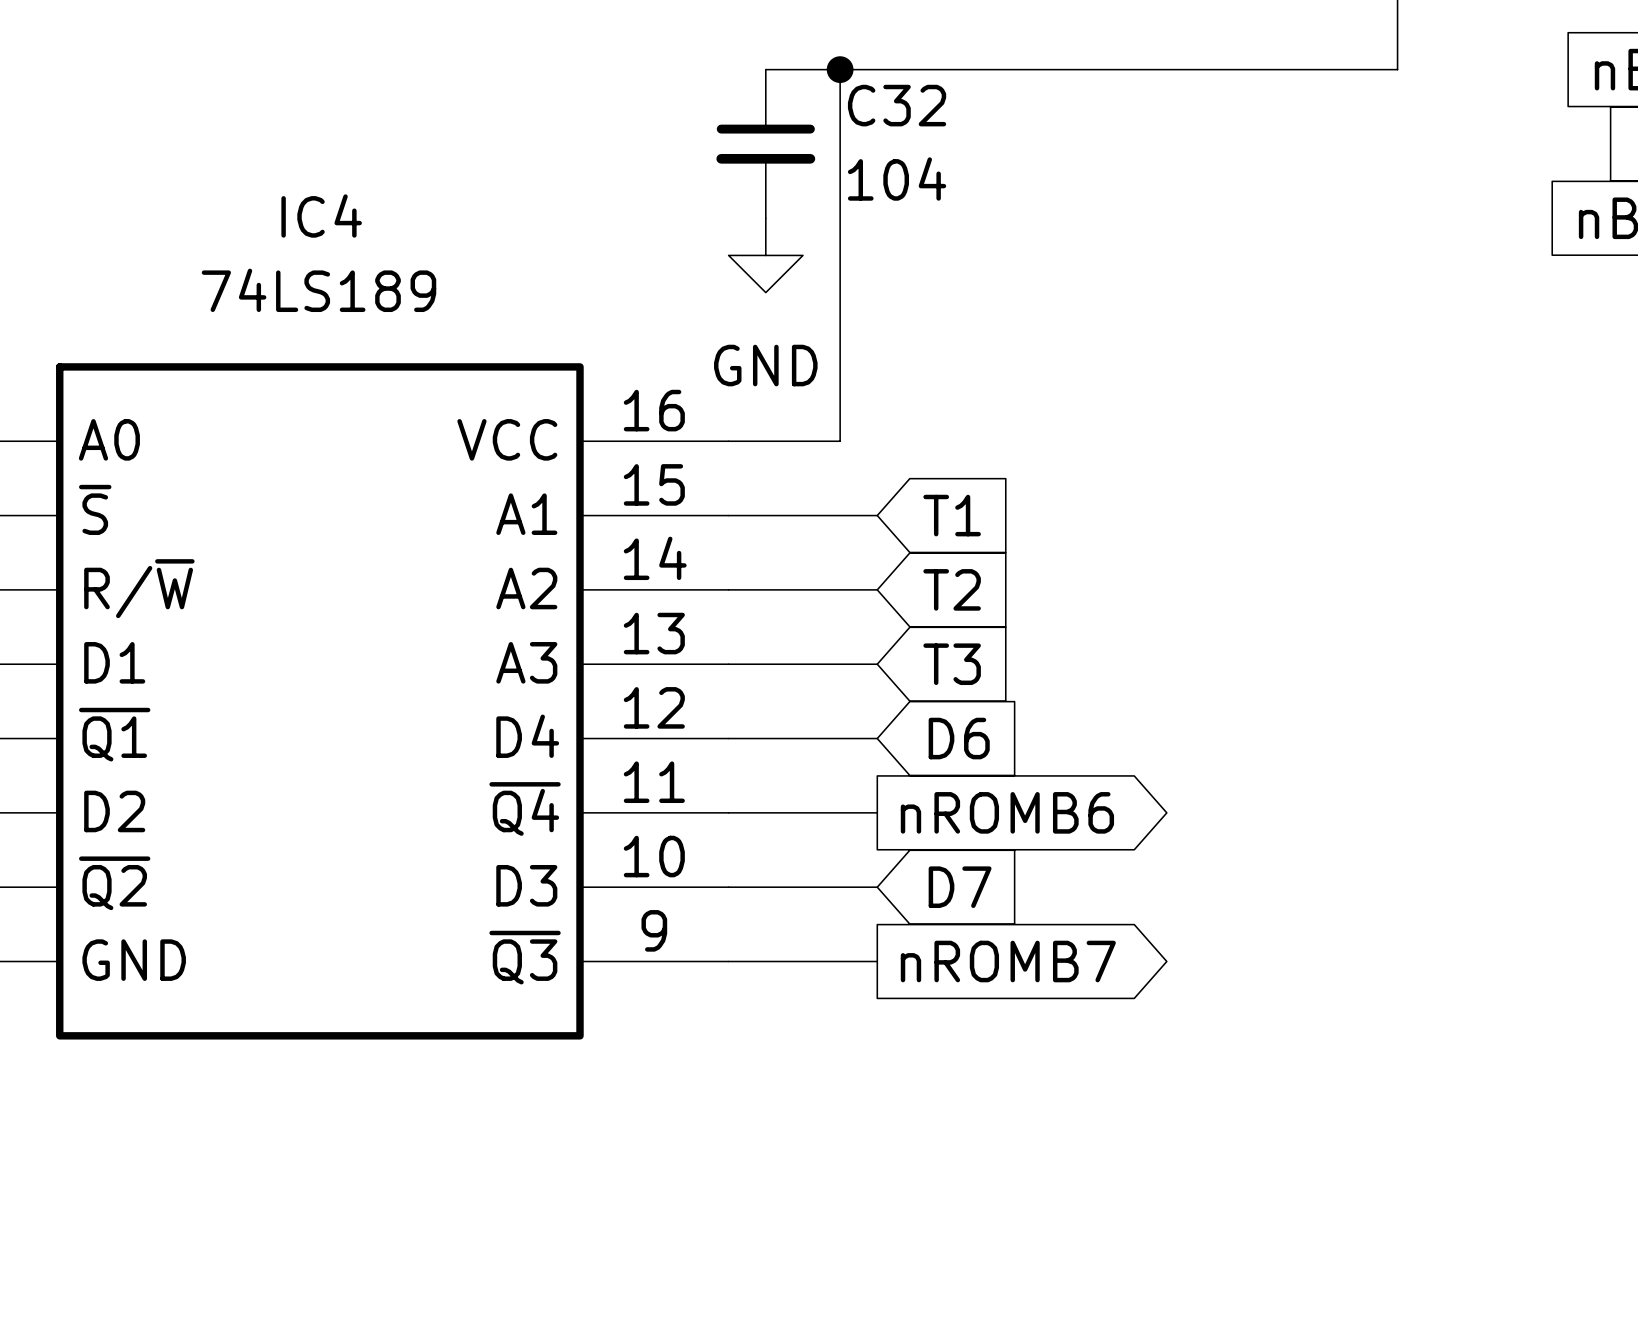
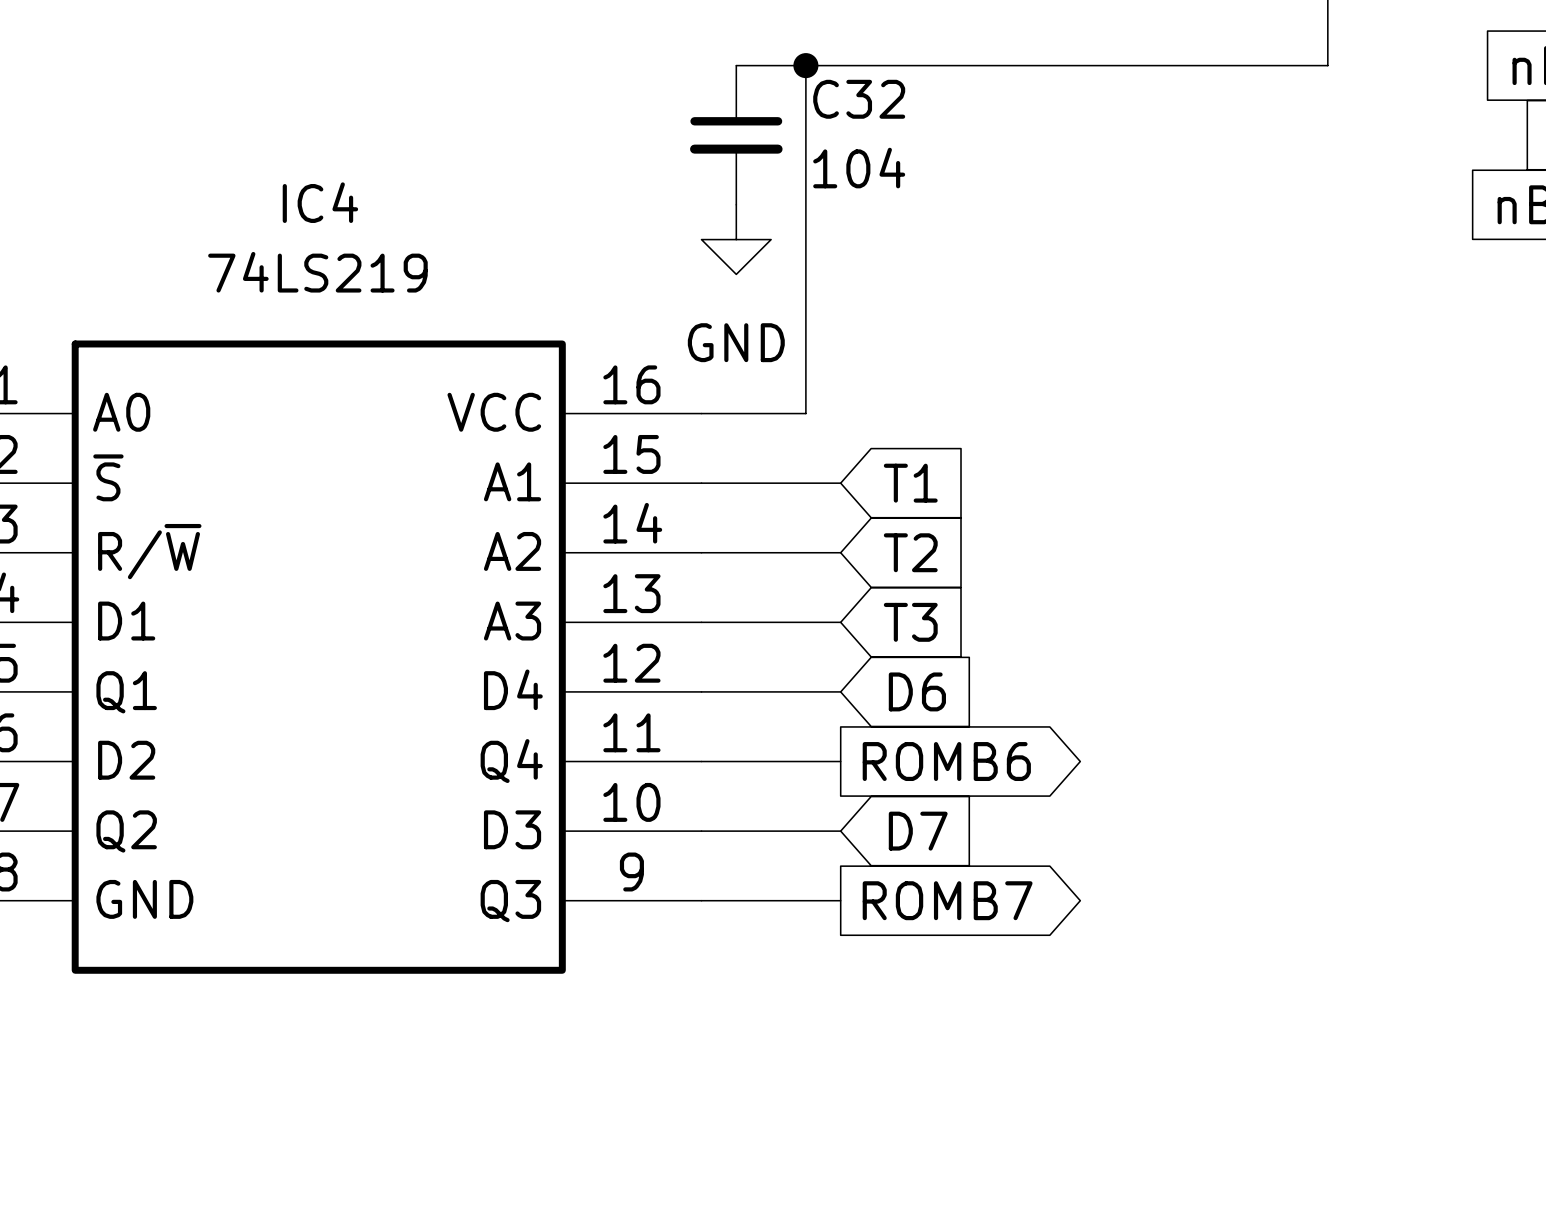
IC4 value: 74LS189 (318, 290) -> 74LS219 (317, 272)
IC4 pin name: ~{Q1} (114, 734) -> Q1 (126, 692)
IC4 pin name: ~{Q4} (525, 808) -> Q4 (511, 761)
global label: nROMB6 (1007, 812) -> ROMB6 (946, 761)
IC4 pin name: ~{Q2} (114, 883) -> Q2 (126, 831)
IC4 pin name: ~{Q3} (525, 957) -> Q3 (510, 901)
global label: nROMB7 (1008, 961) -> ROMB7 (947, 900)

